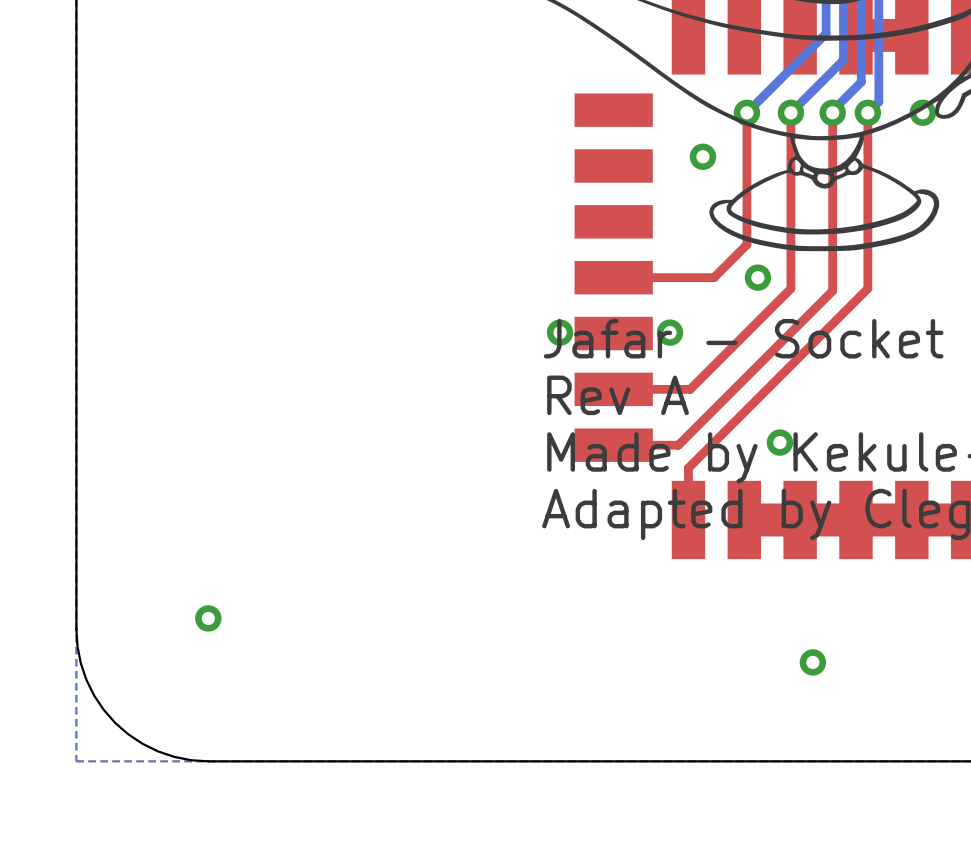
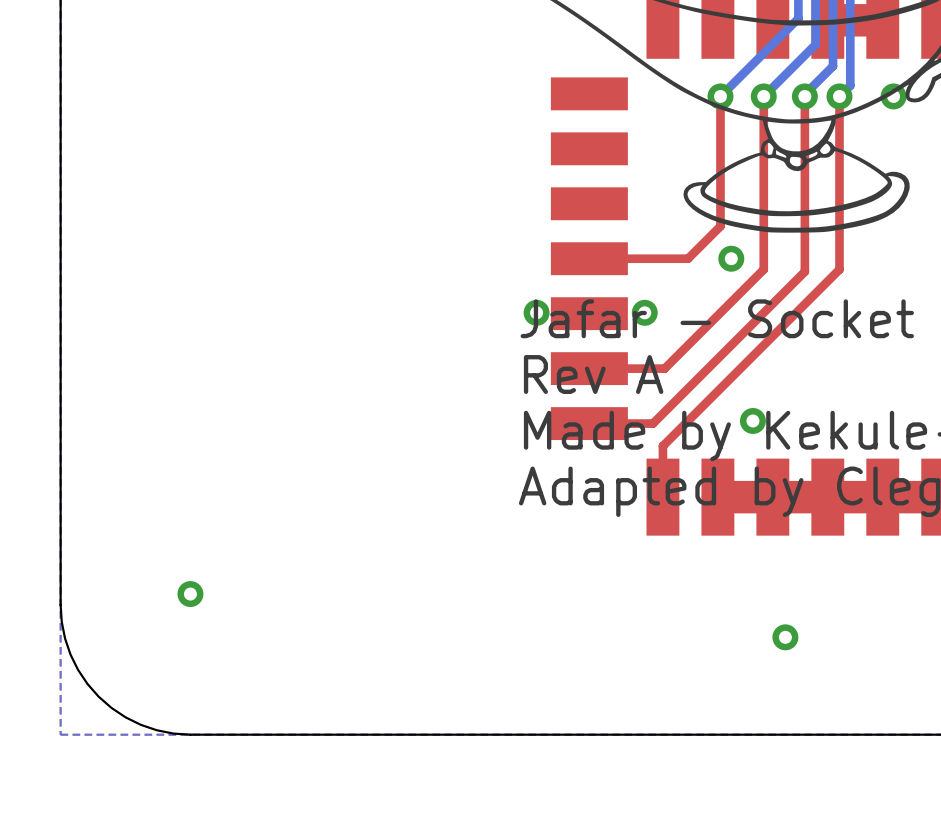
via: (702, 156) -> none

